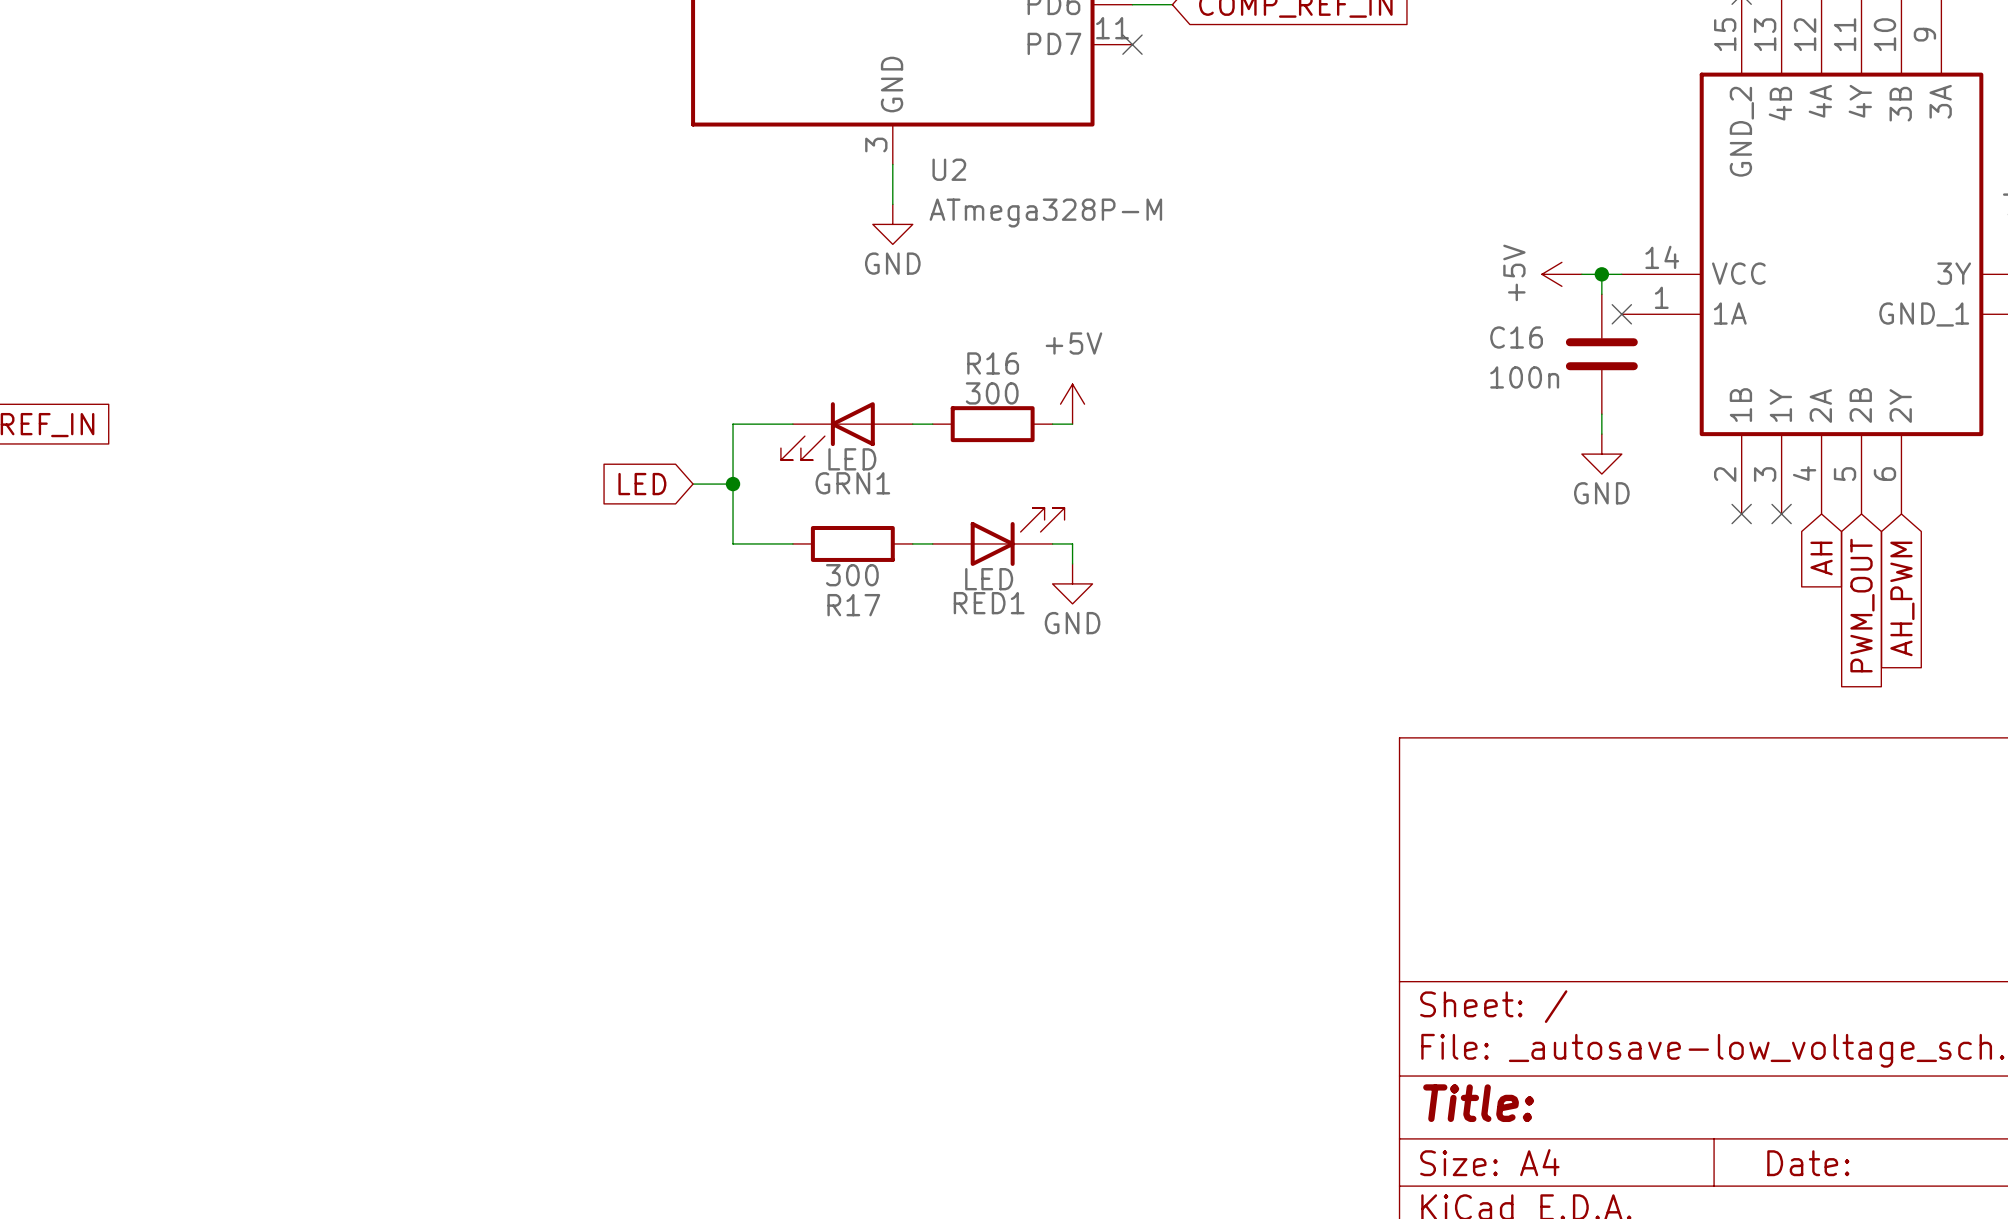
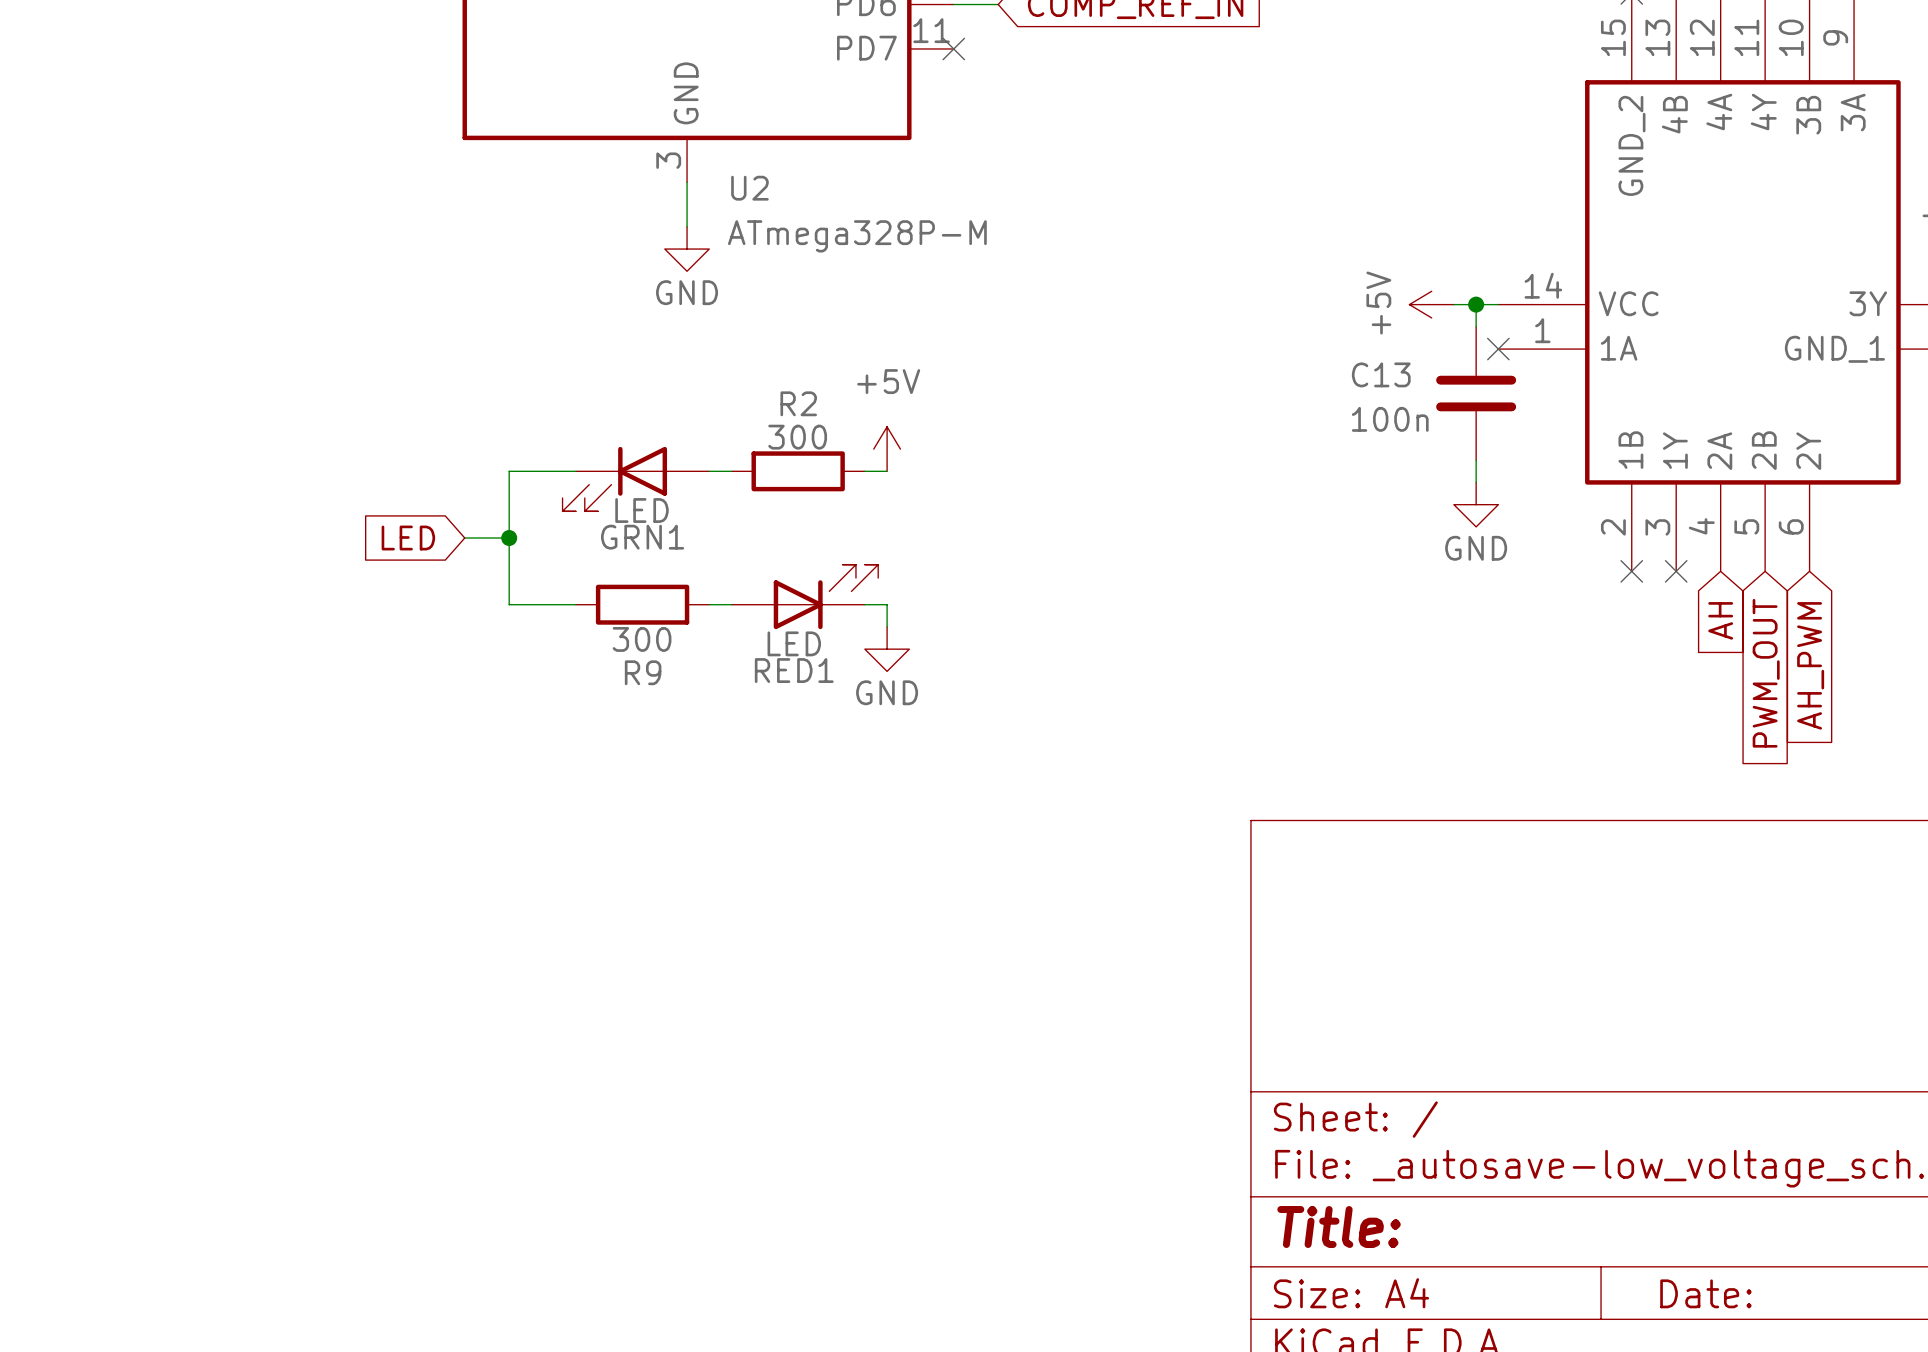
C16 name: C16 (1516, 337) -> C13 (1381, 374)
R16 name: R16 (993, 363) -> R2 (798, 403)
R17 name: R17 (853, 605) -> R9 (643, 672)

